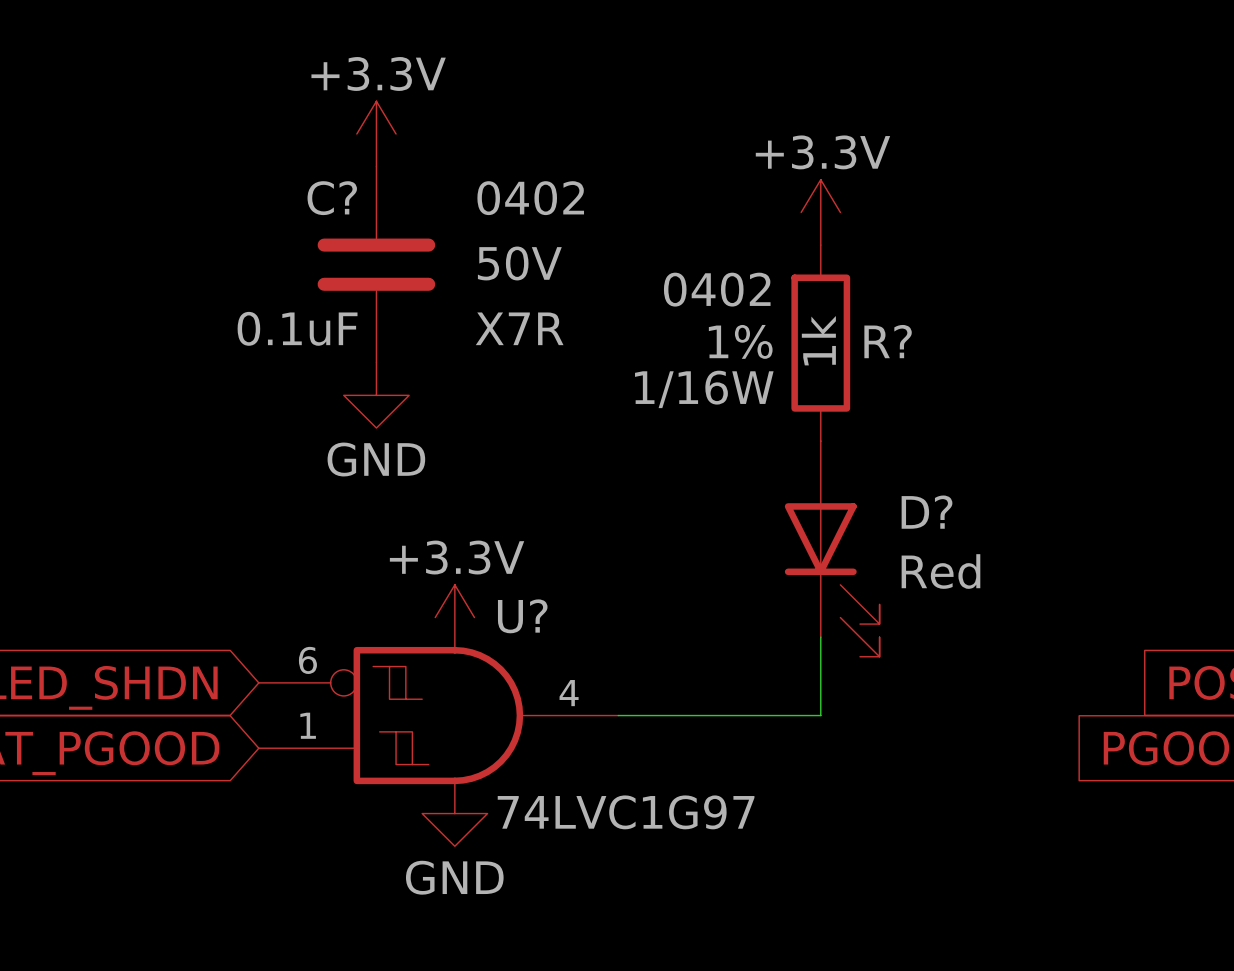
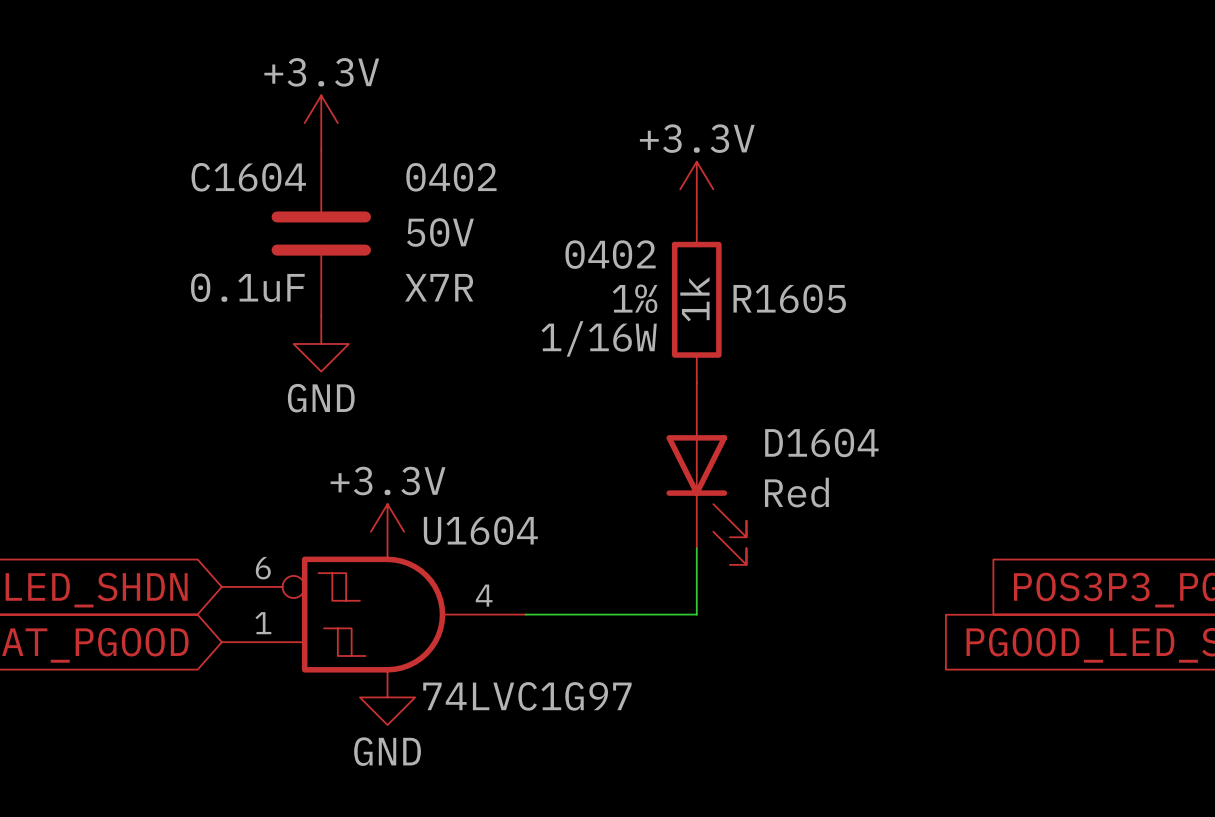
C? name: C? (332, 198) -> C1604 (248, 177)
R? name: R? (888, 341) -> R1605 (789, 298)
D? name: D? (927, 512) -> D1604 (821, 442)
U? name: U? (522, 616) -> U1604 (480, 530)

